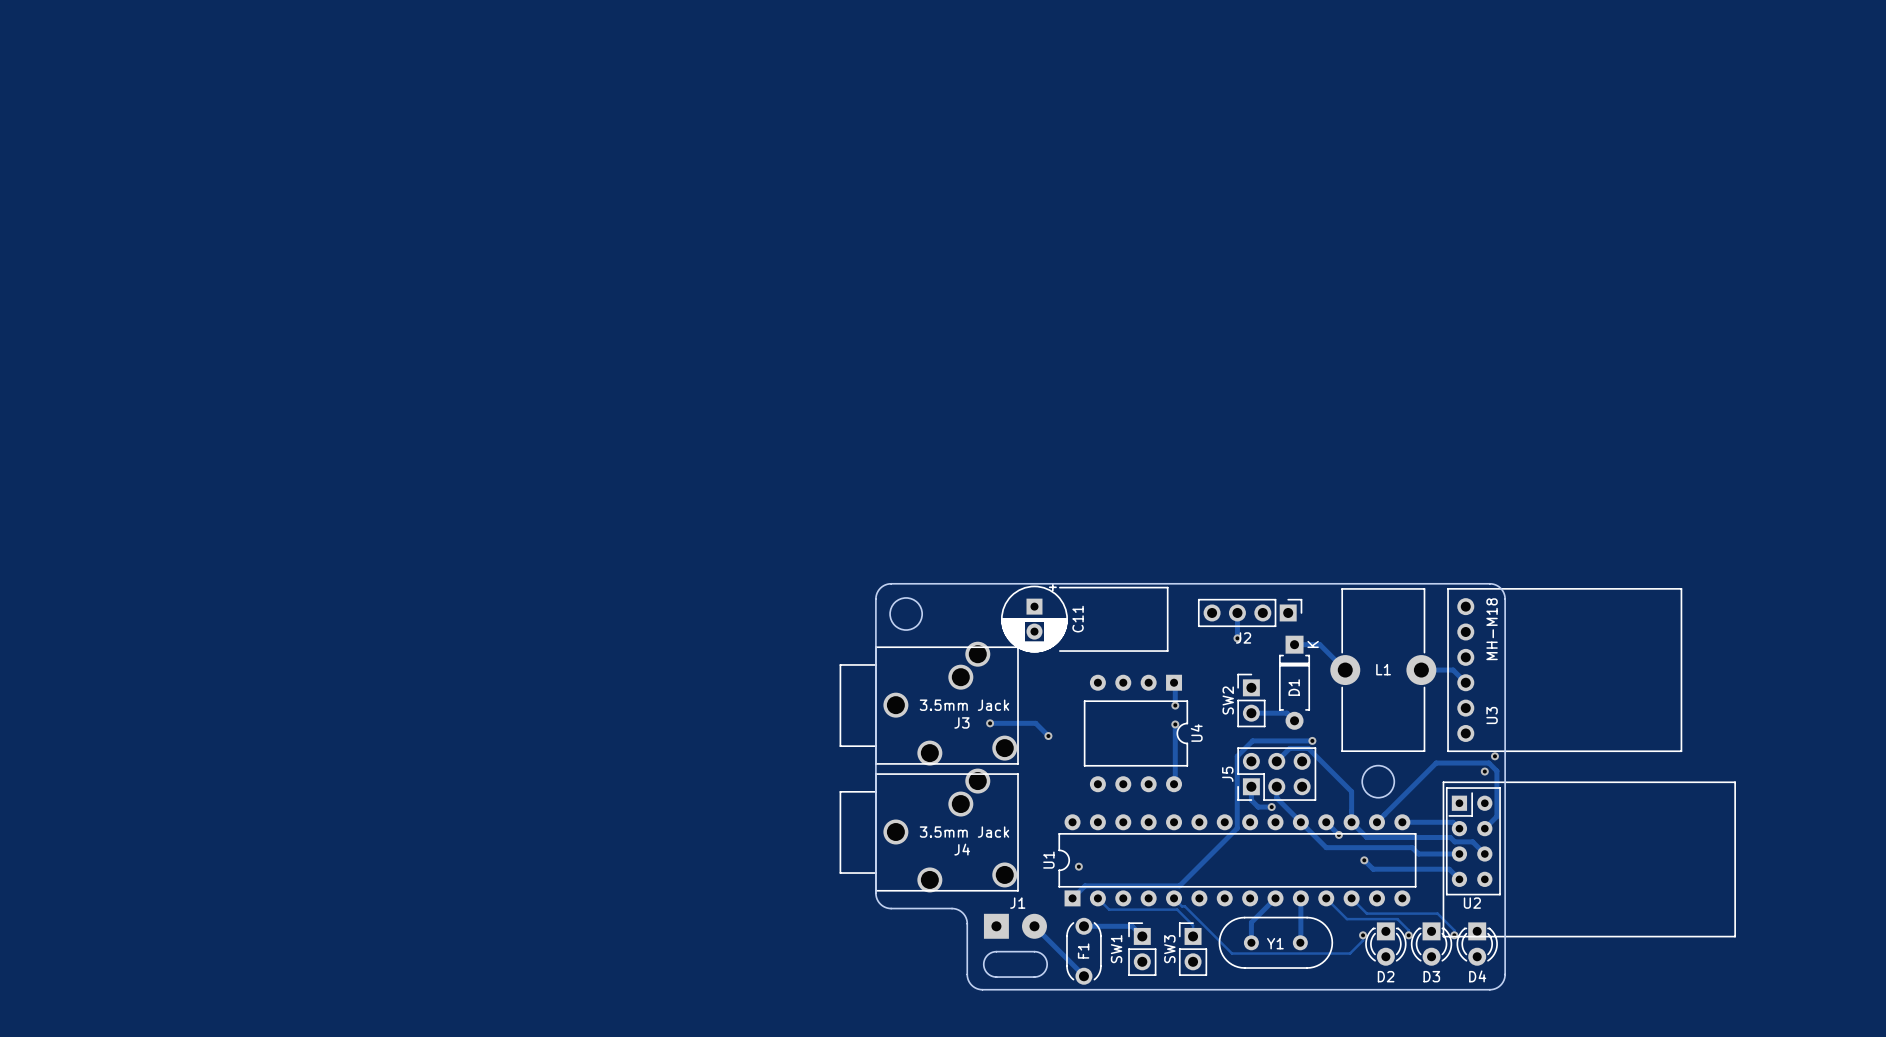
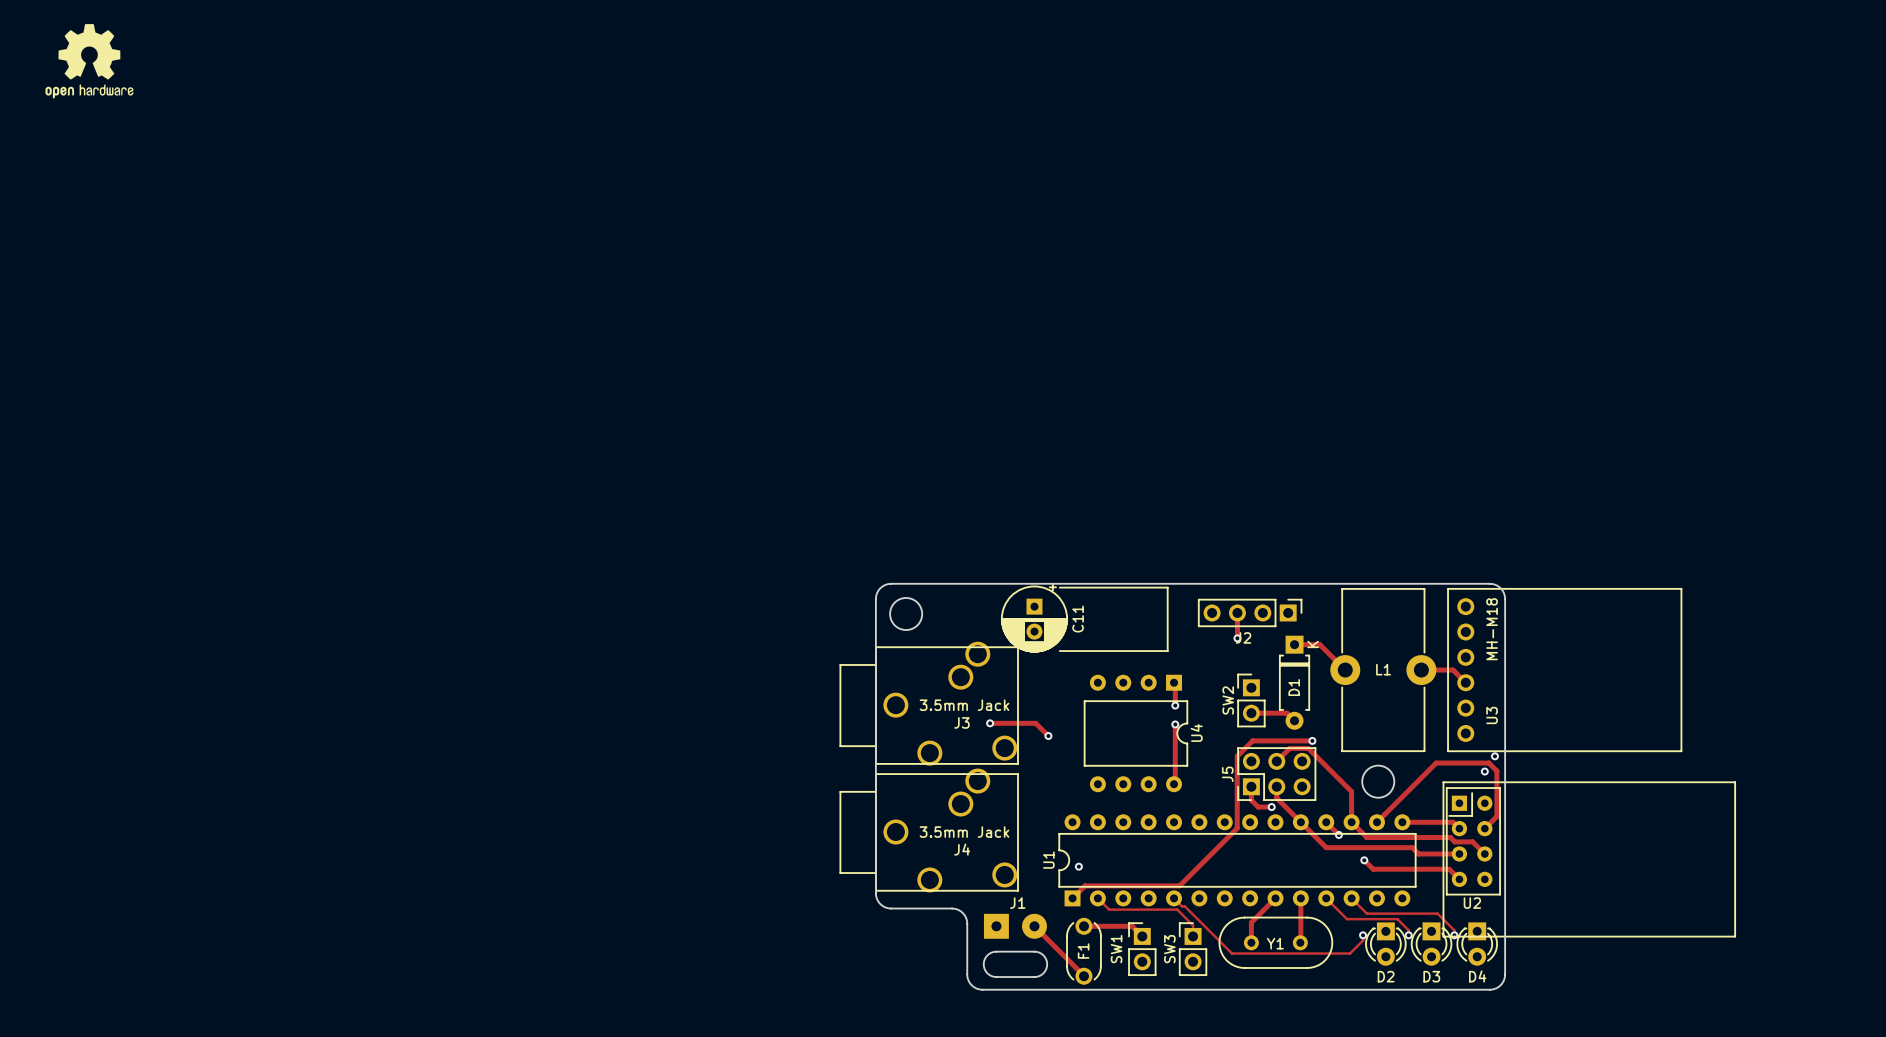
drawing: none -> [45, 24, 134, 99]

